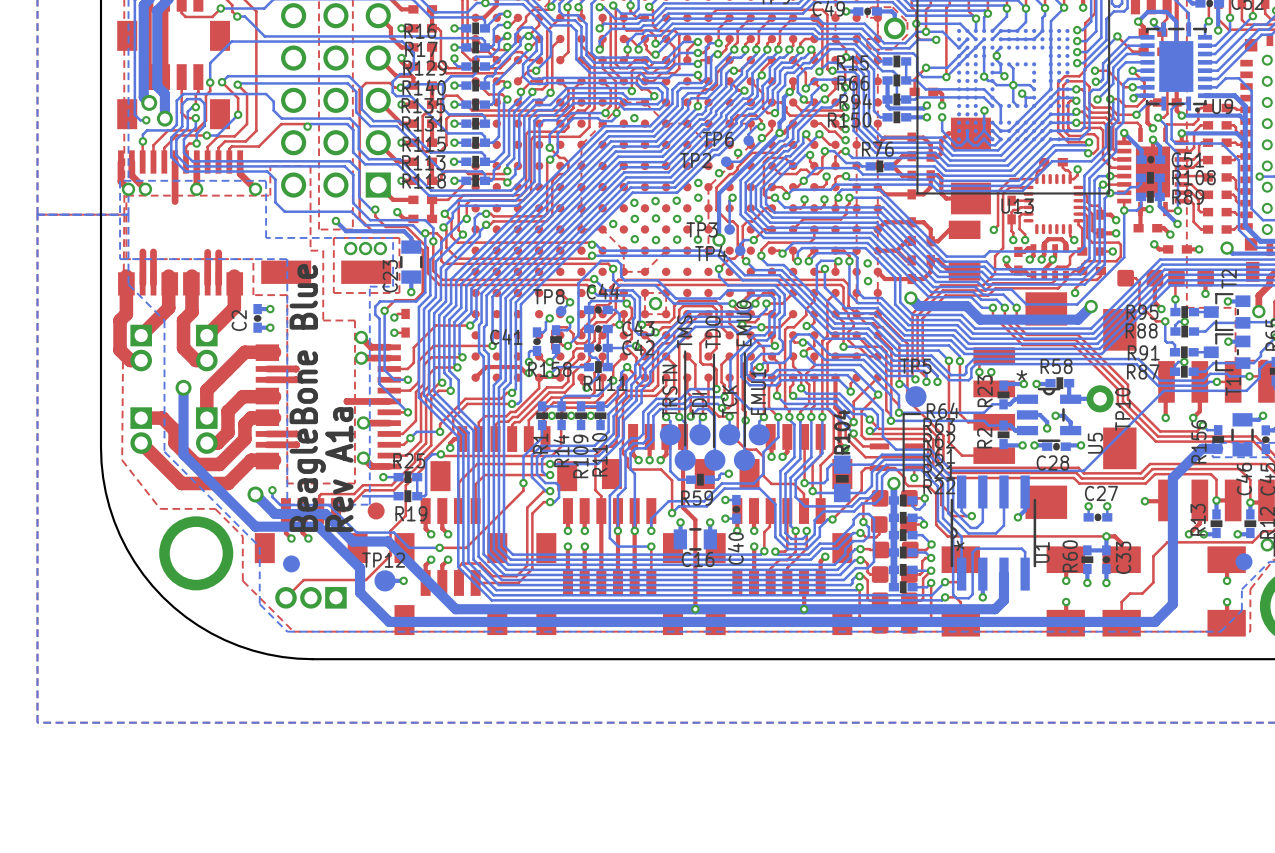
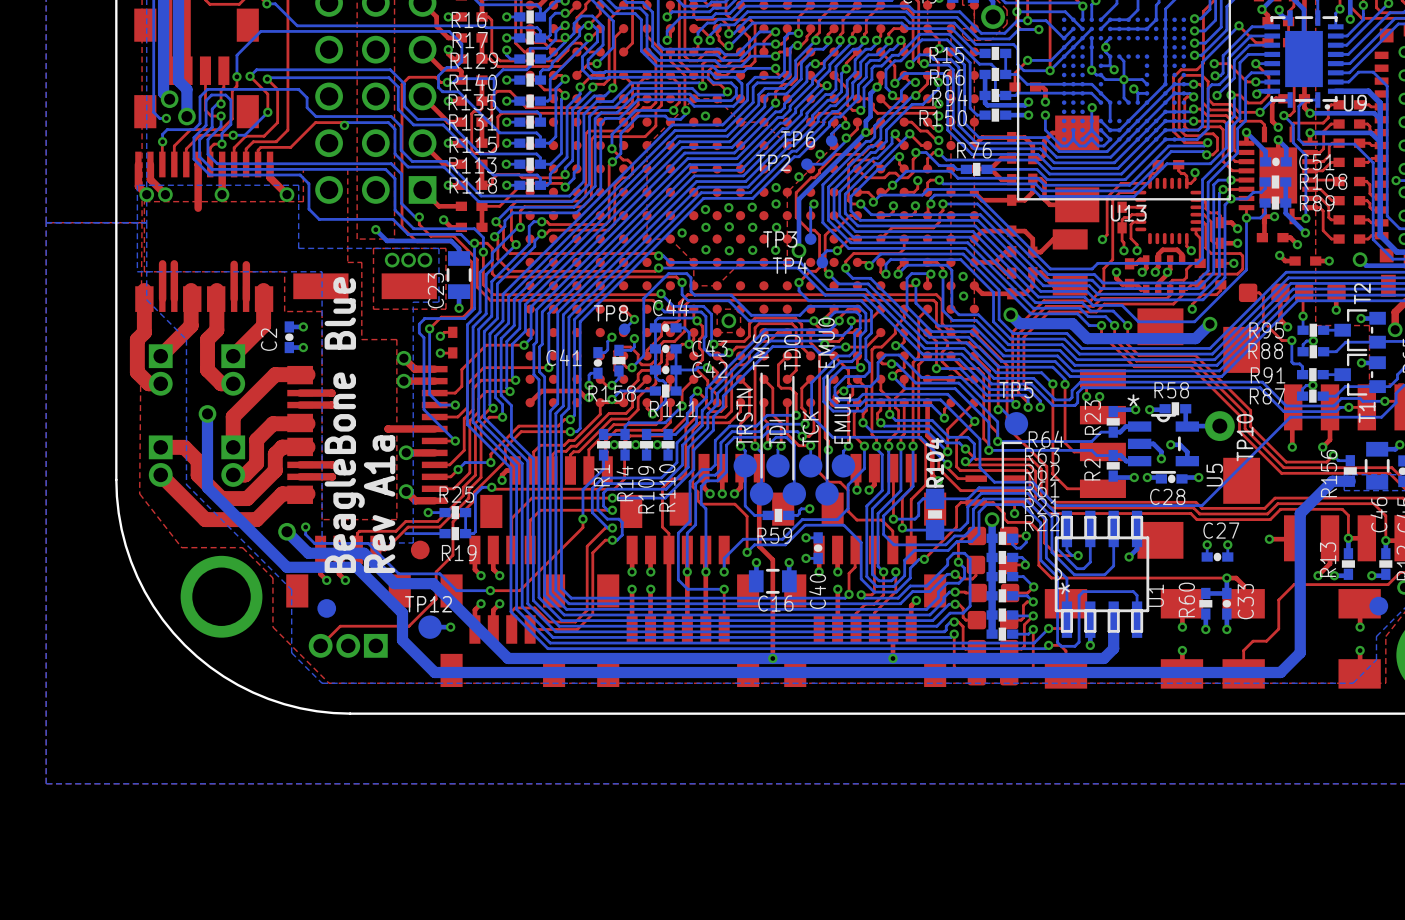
U1 footprint: [950, 475, 1037, 591] -> [1054, 510, 1150, 638]

